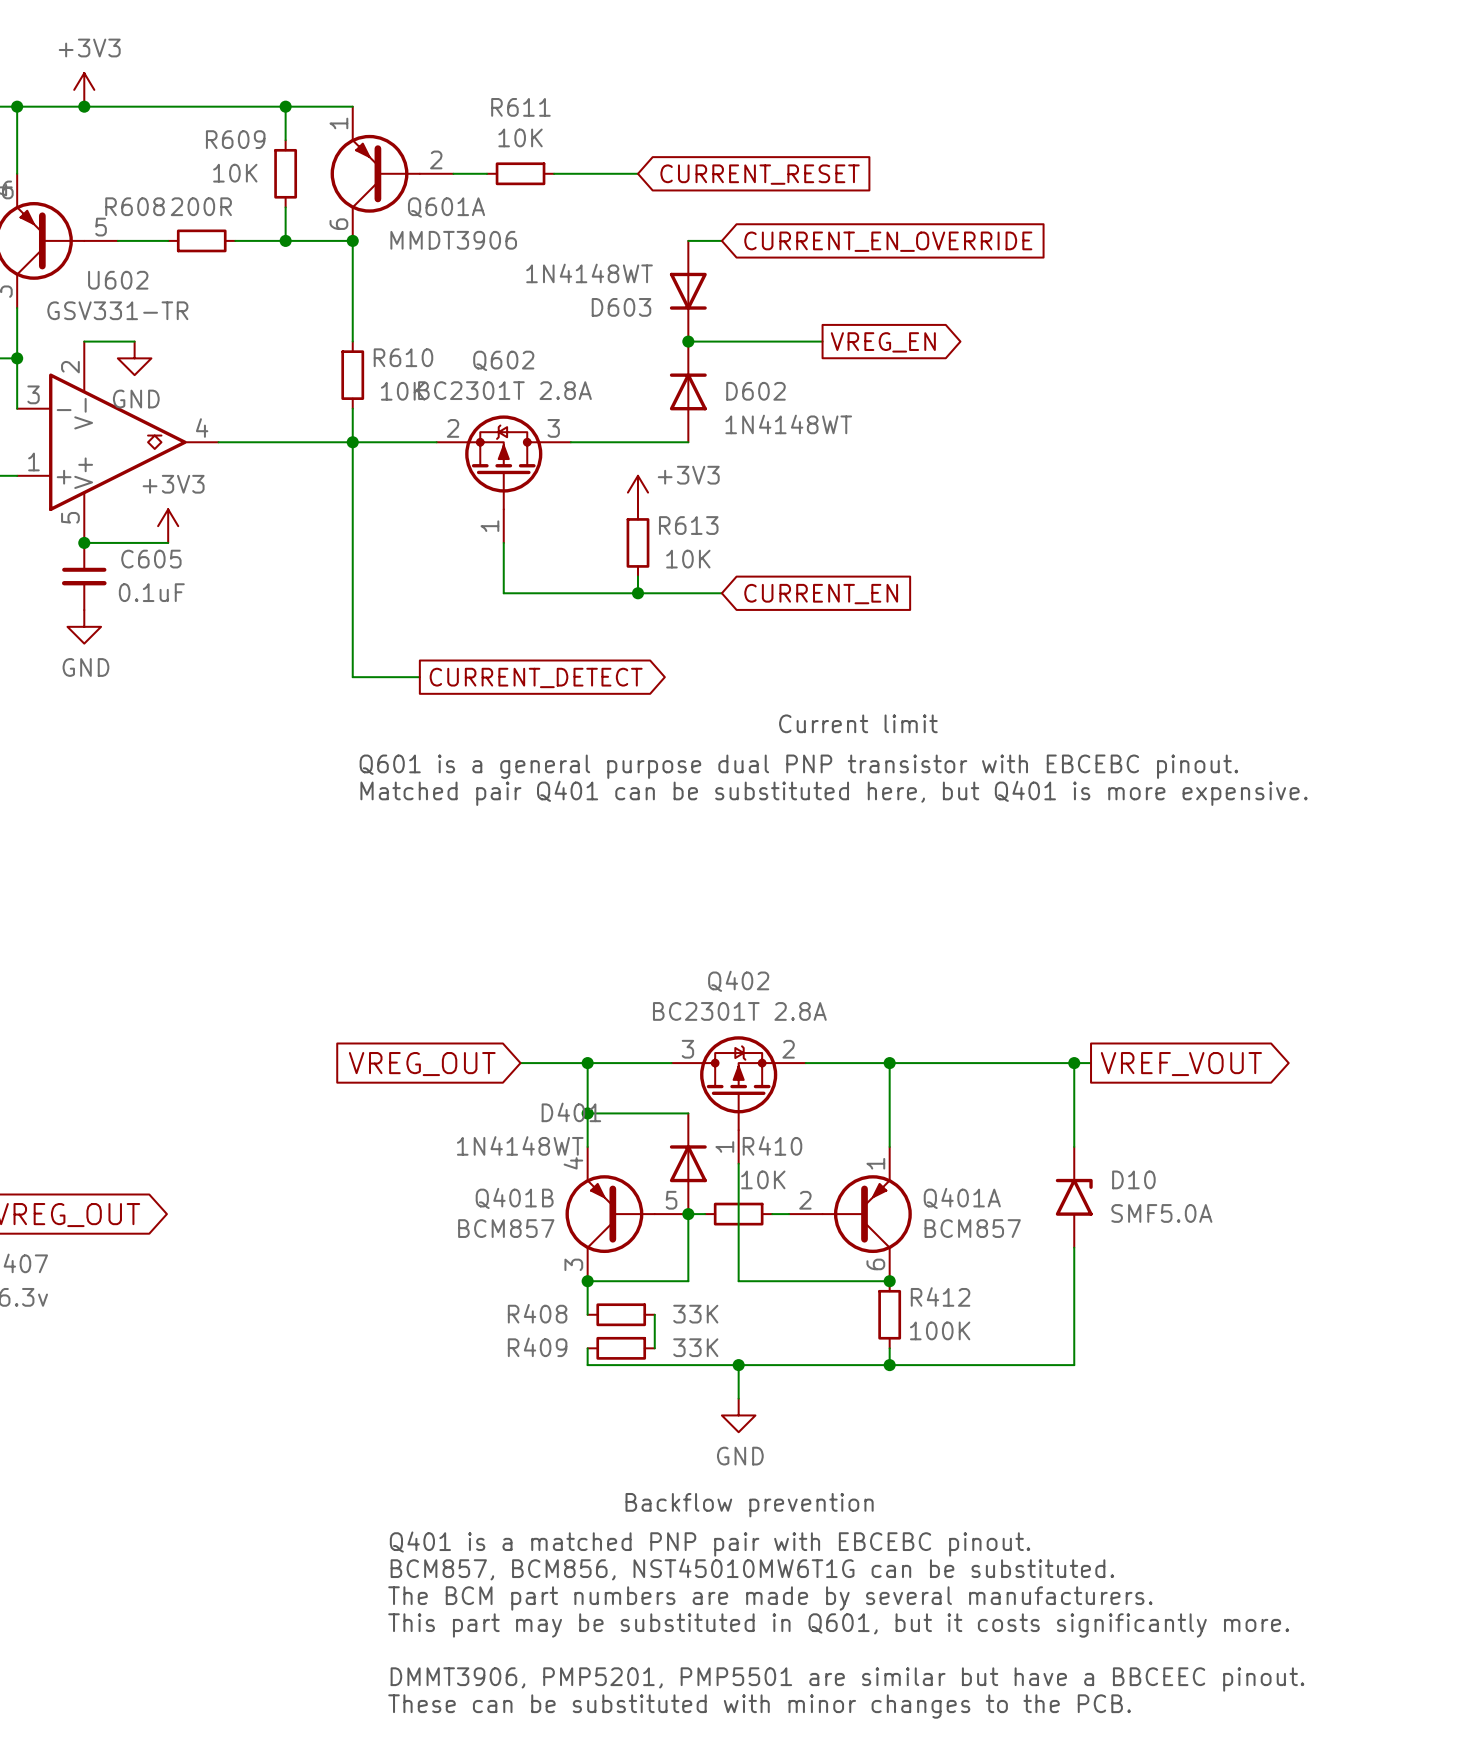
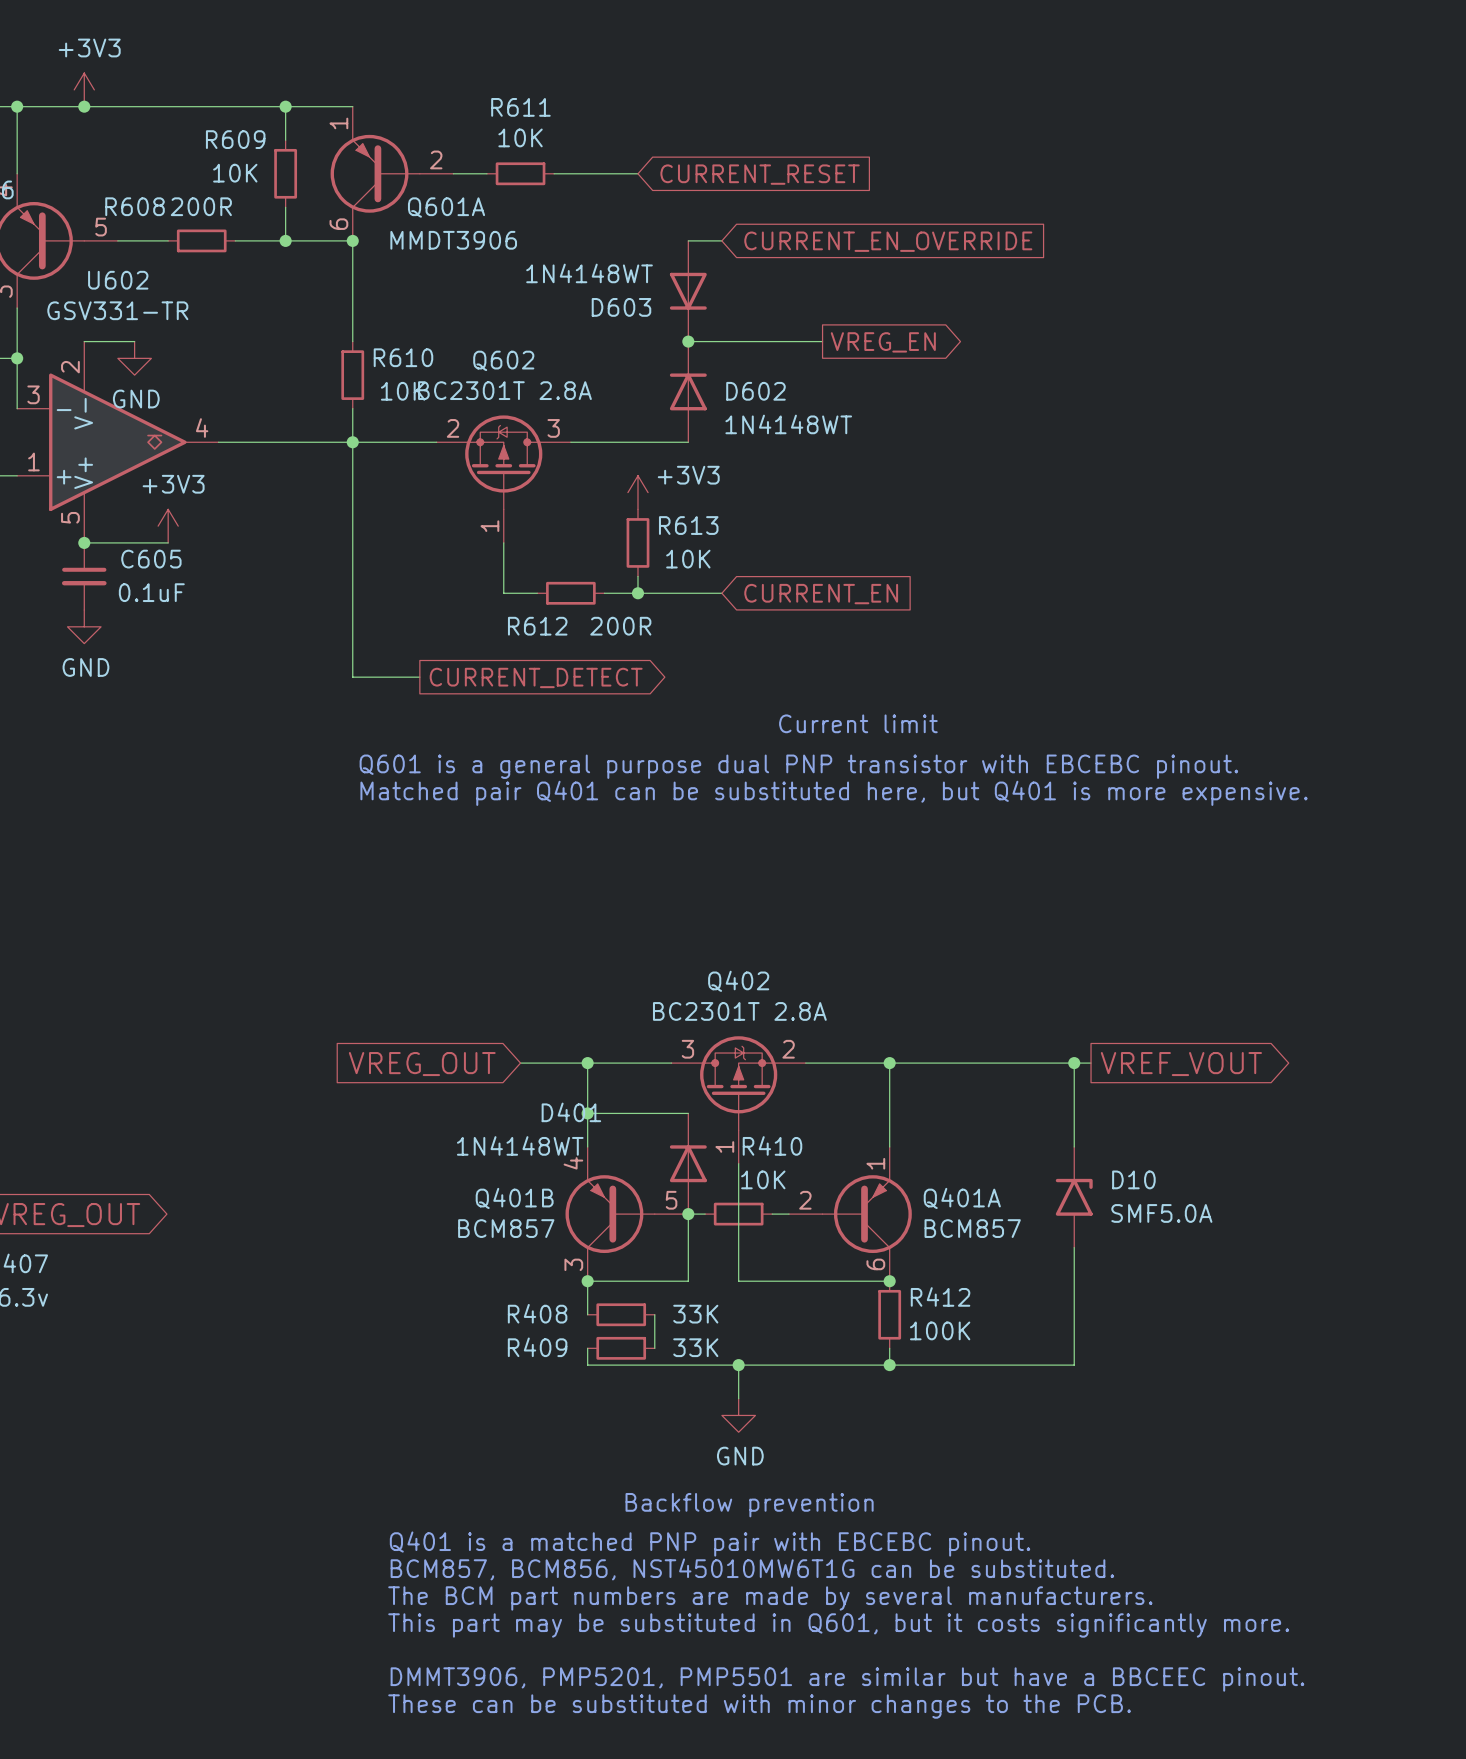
wire: (537, 593) (604, 593) -> none
R612: none -> 200R (570, 593)

